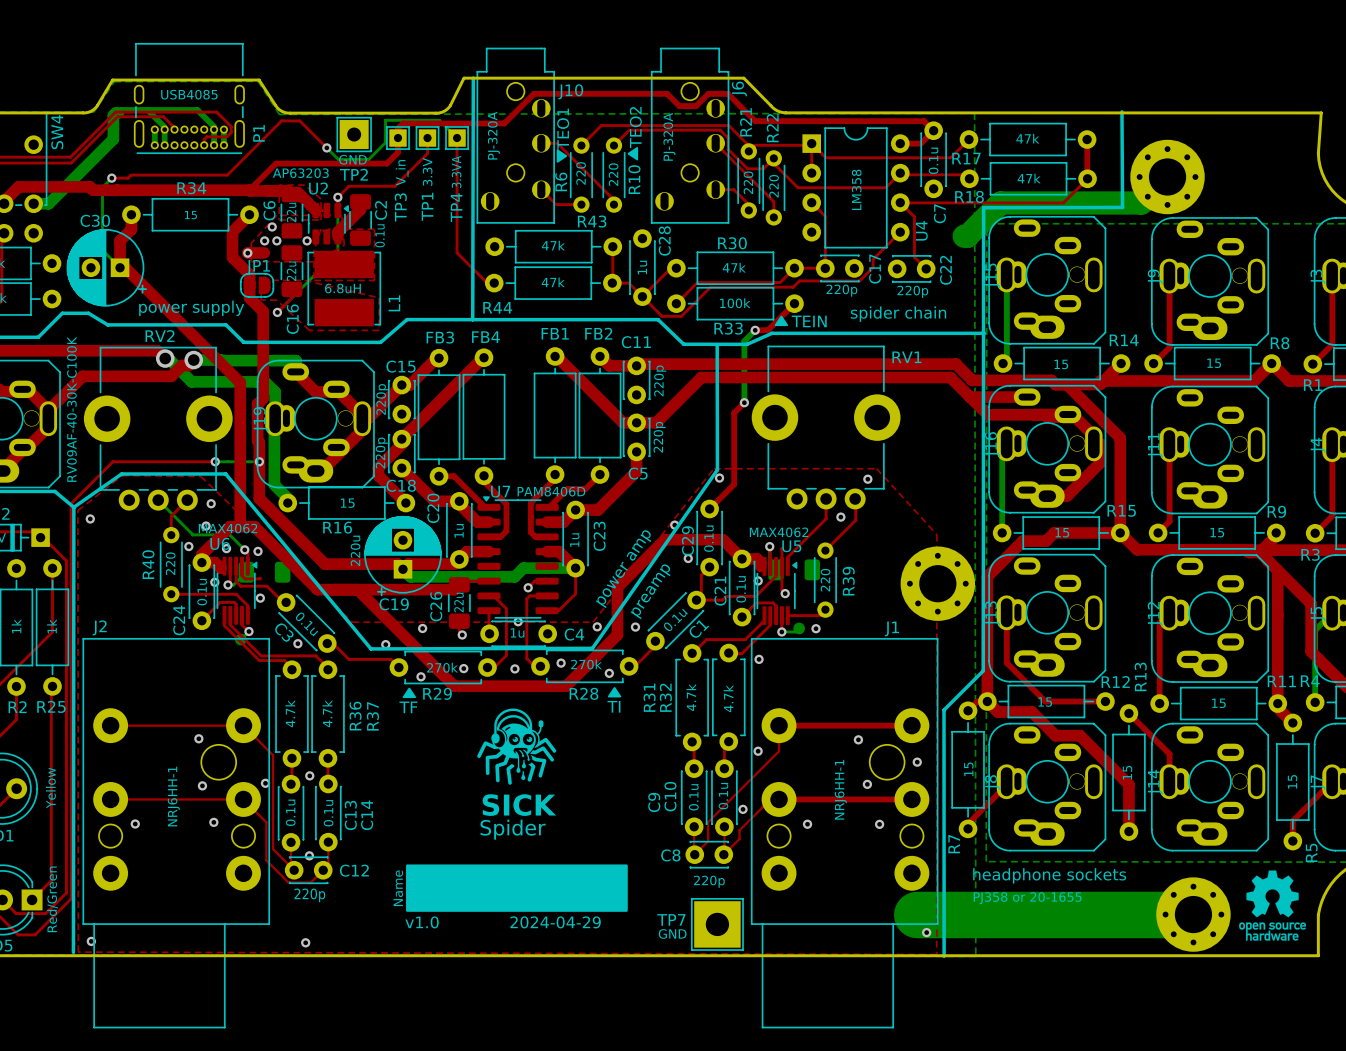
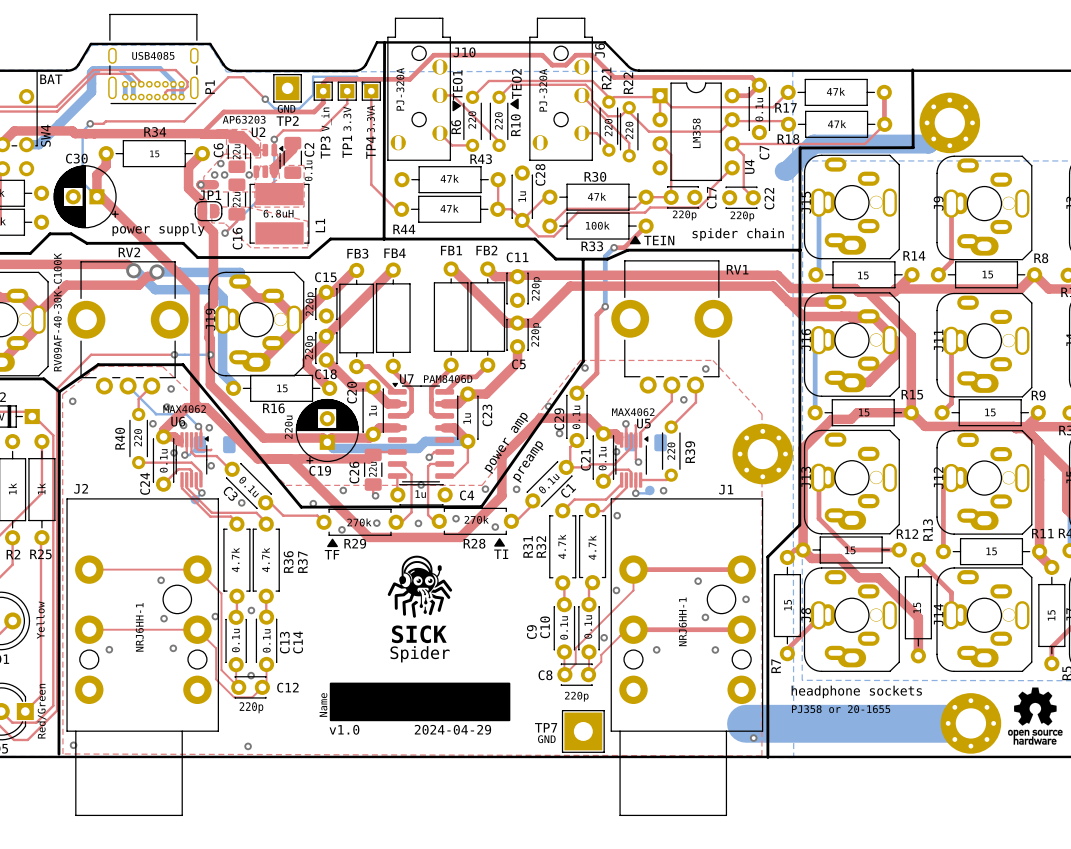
text: none -> BAT (51, 79)
SW4 name position: SW4 (57, 132) -> SW4 (45, 135)

